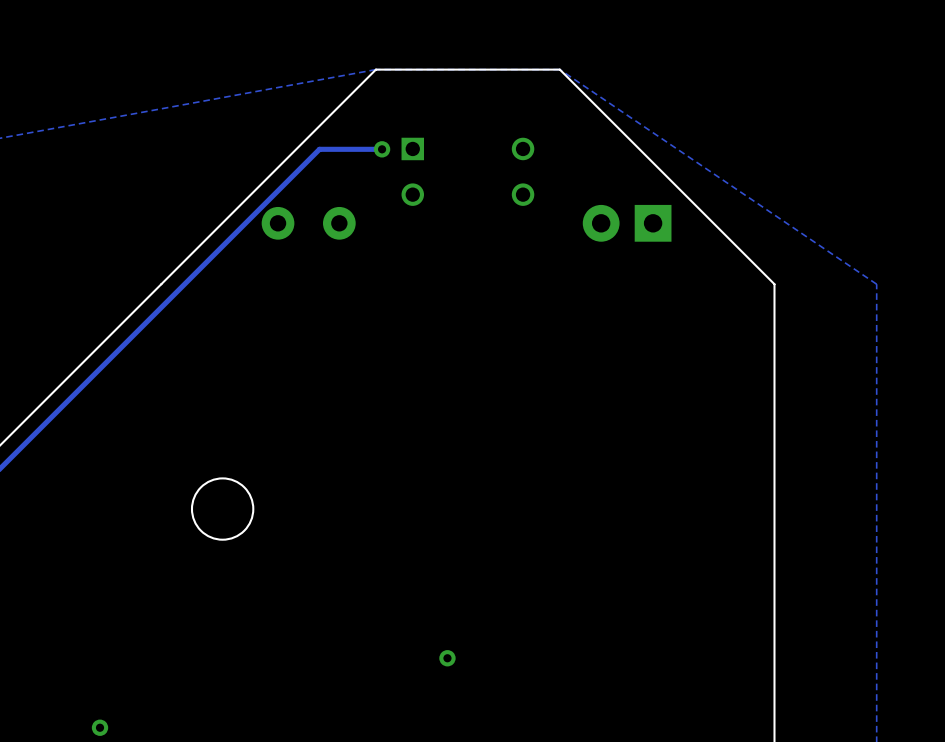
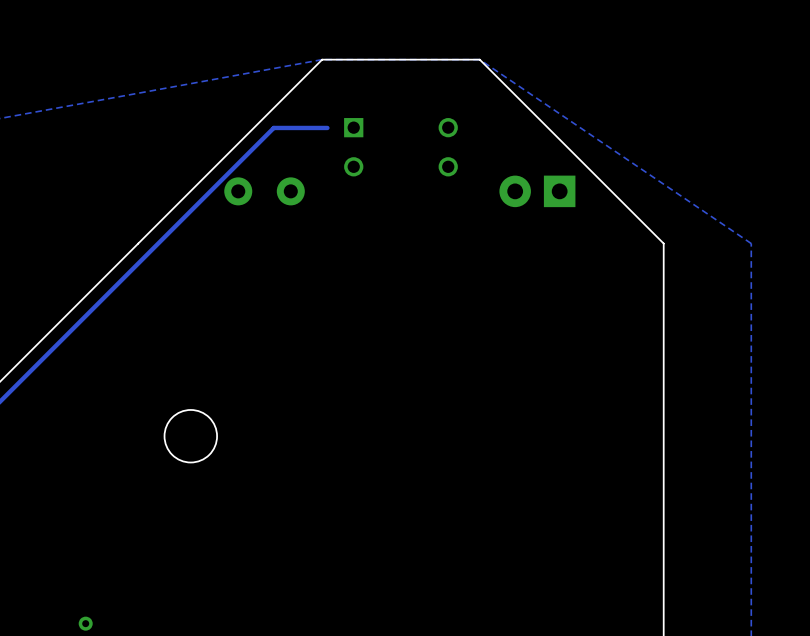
via: (382, 149) -> none
via: (447, 658) -> none

